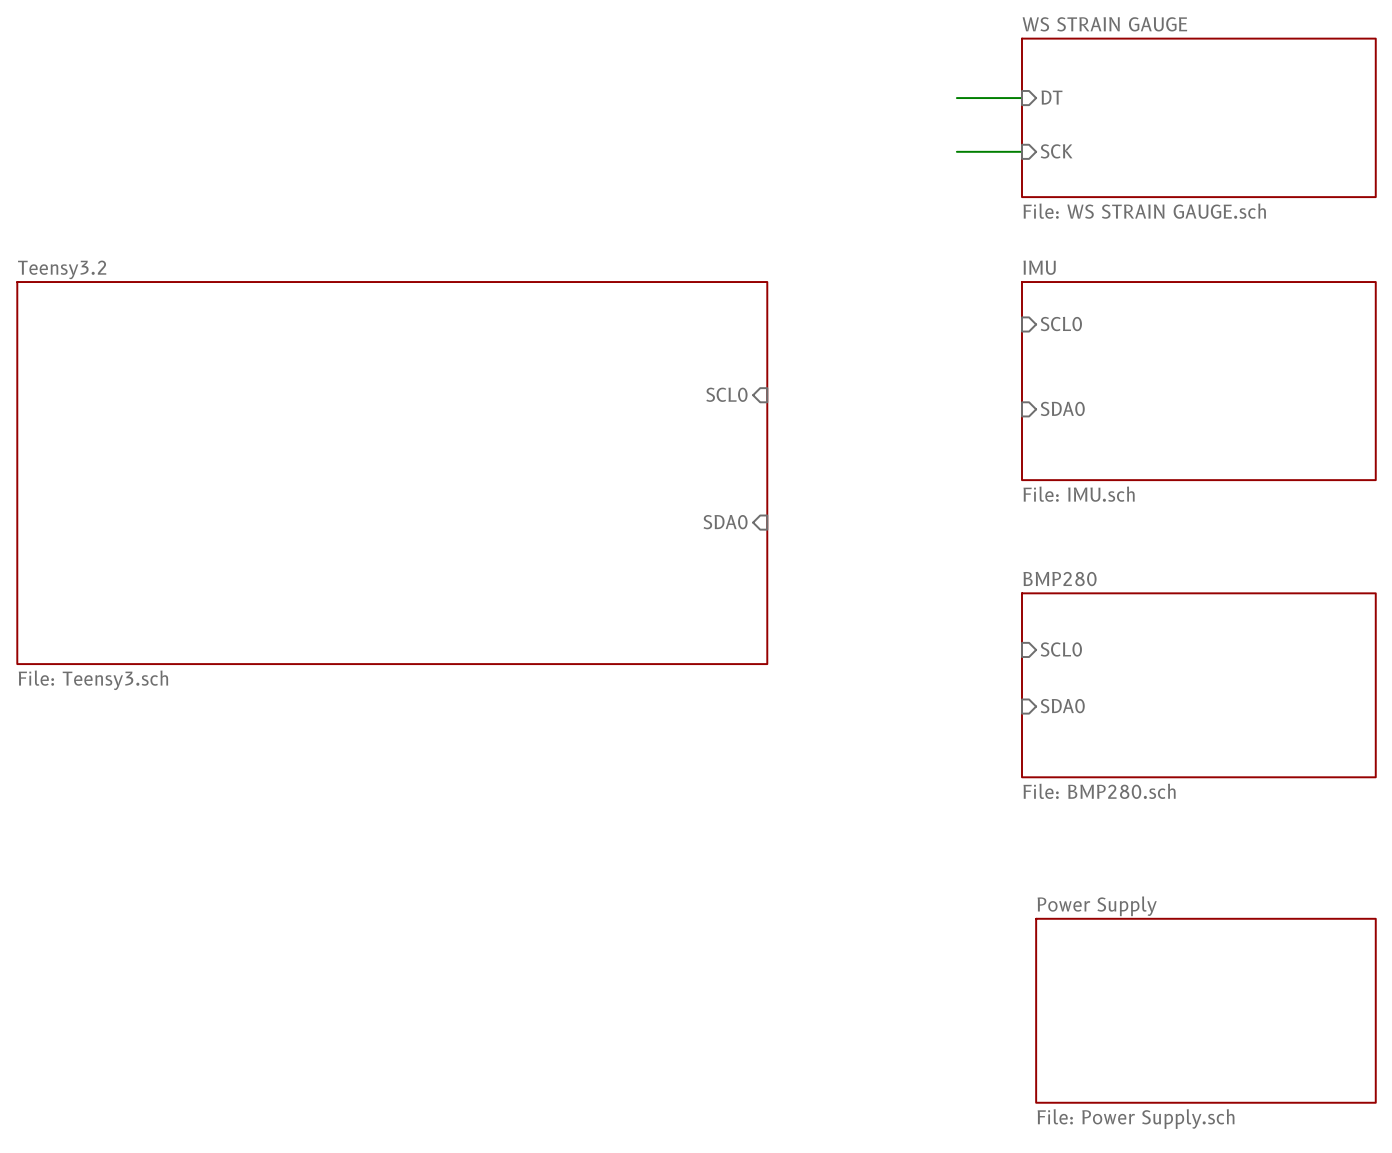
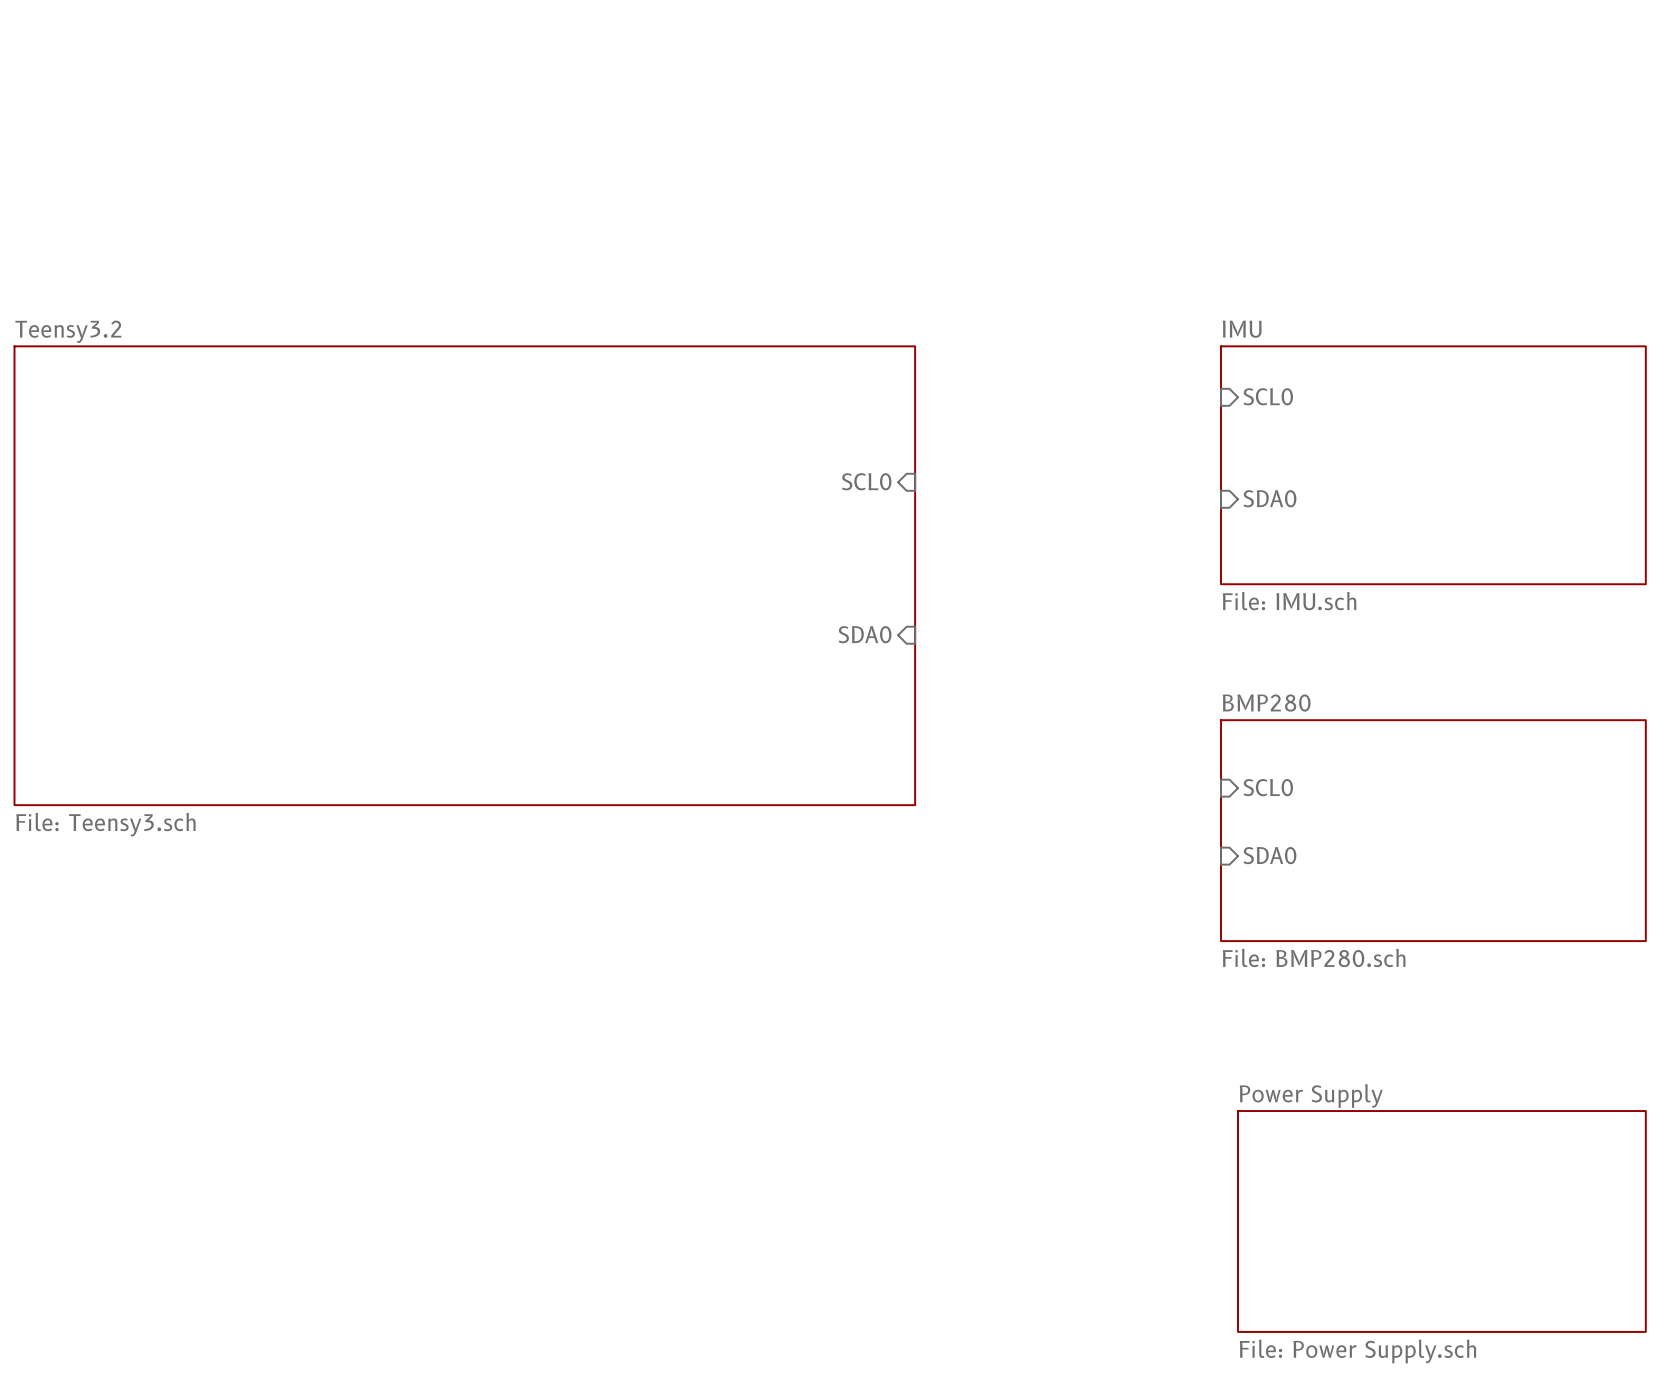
sheet pin: DT (1052, 97) -> none
wire: (956, 98) (1022, 98) -> none
sheet WS STRAIN GAUGE: File: WS STRAIN GAUGE.sch (1198, 117) -> none
wire: (956, 151) (1022, 151) -> none
sheet pin: SCK (1056, 151) -> none

